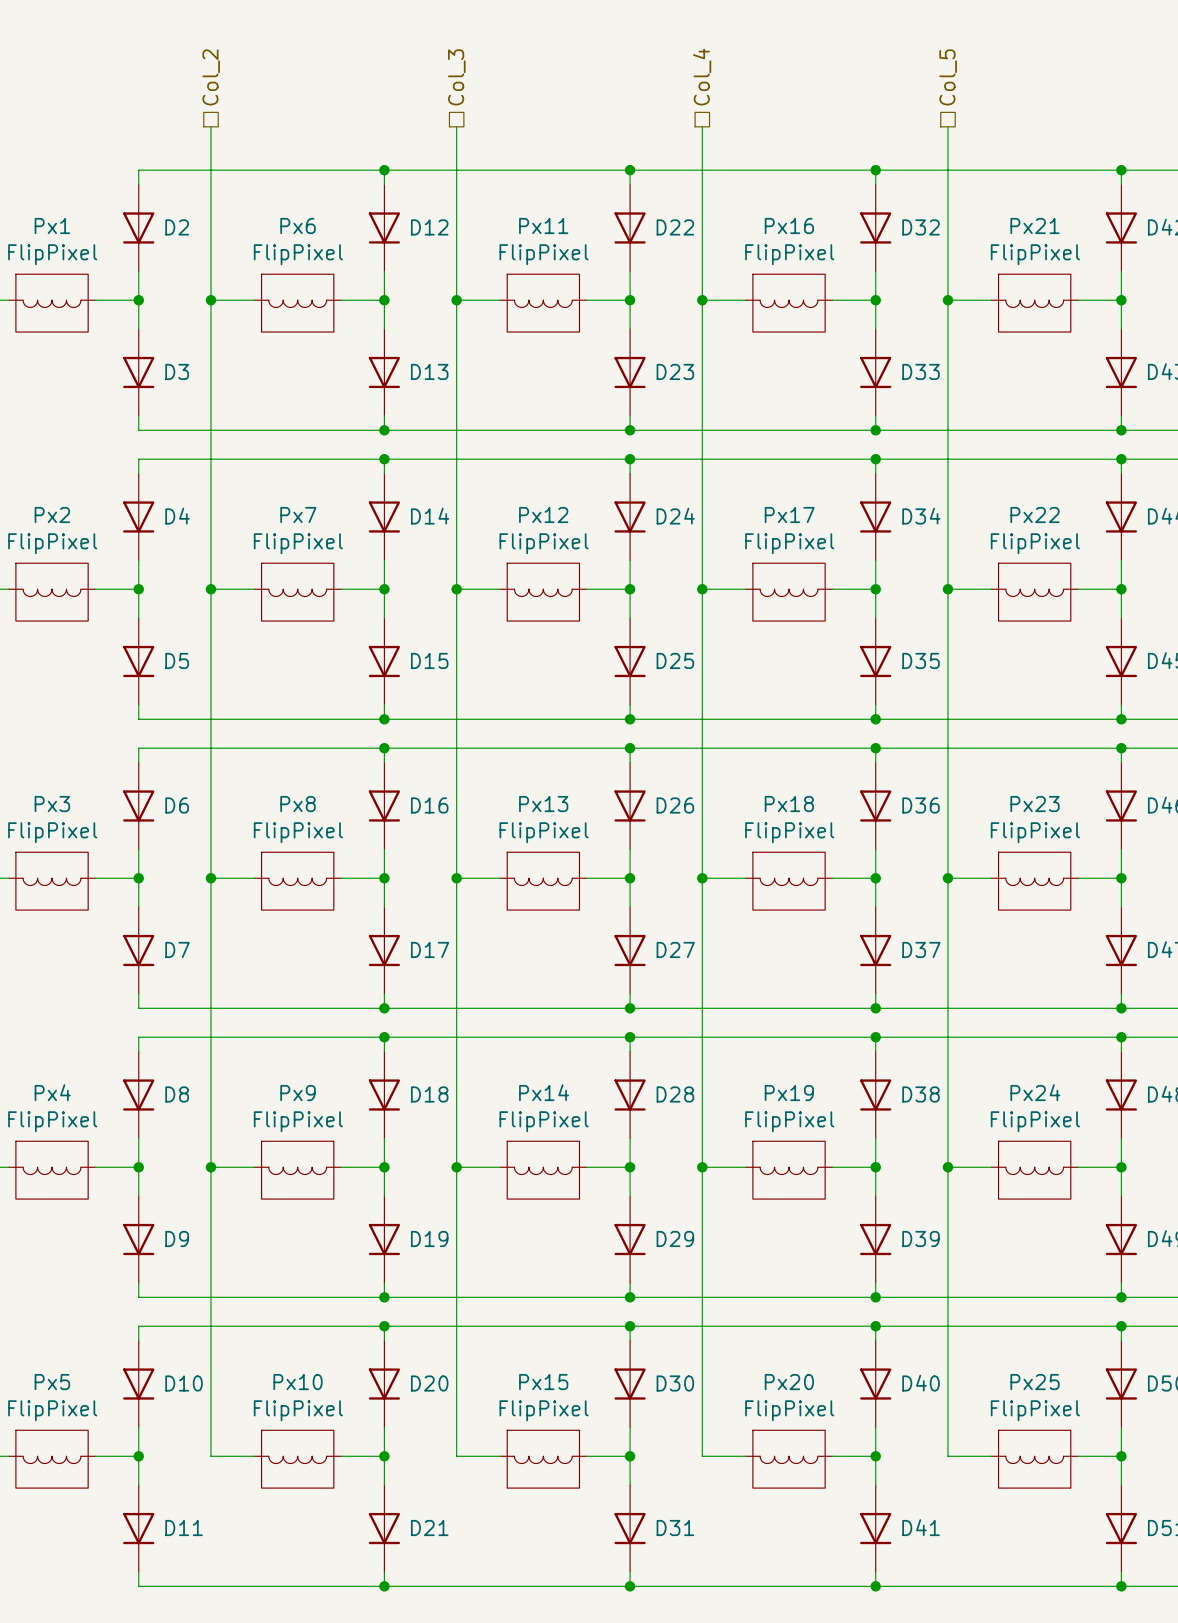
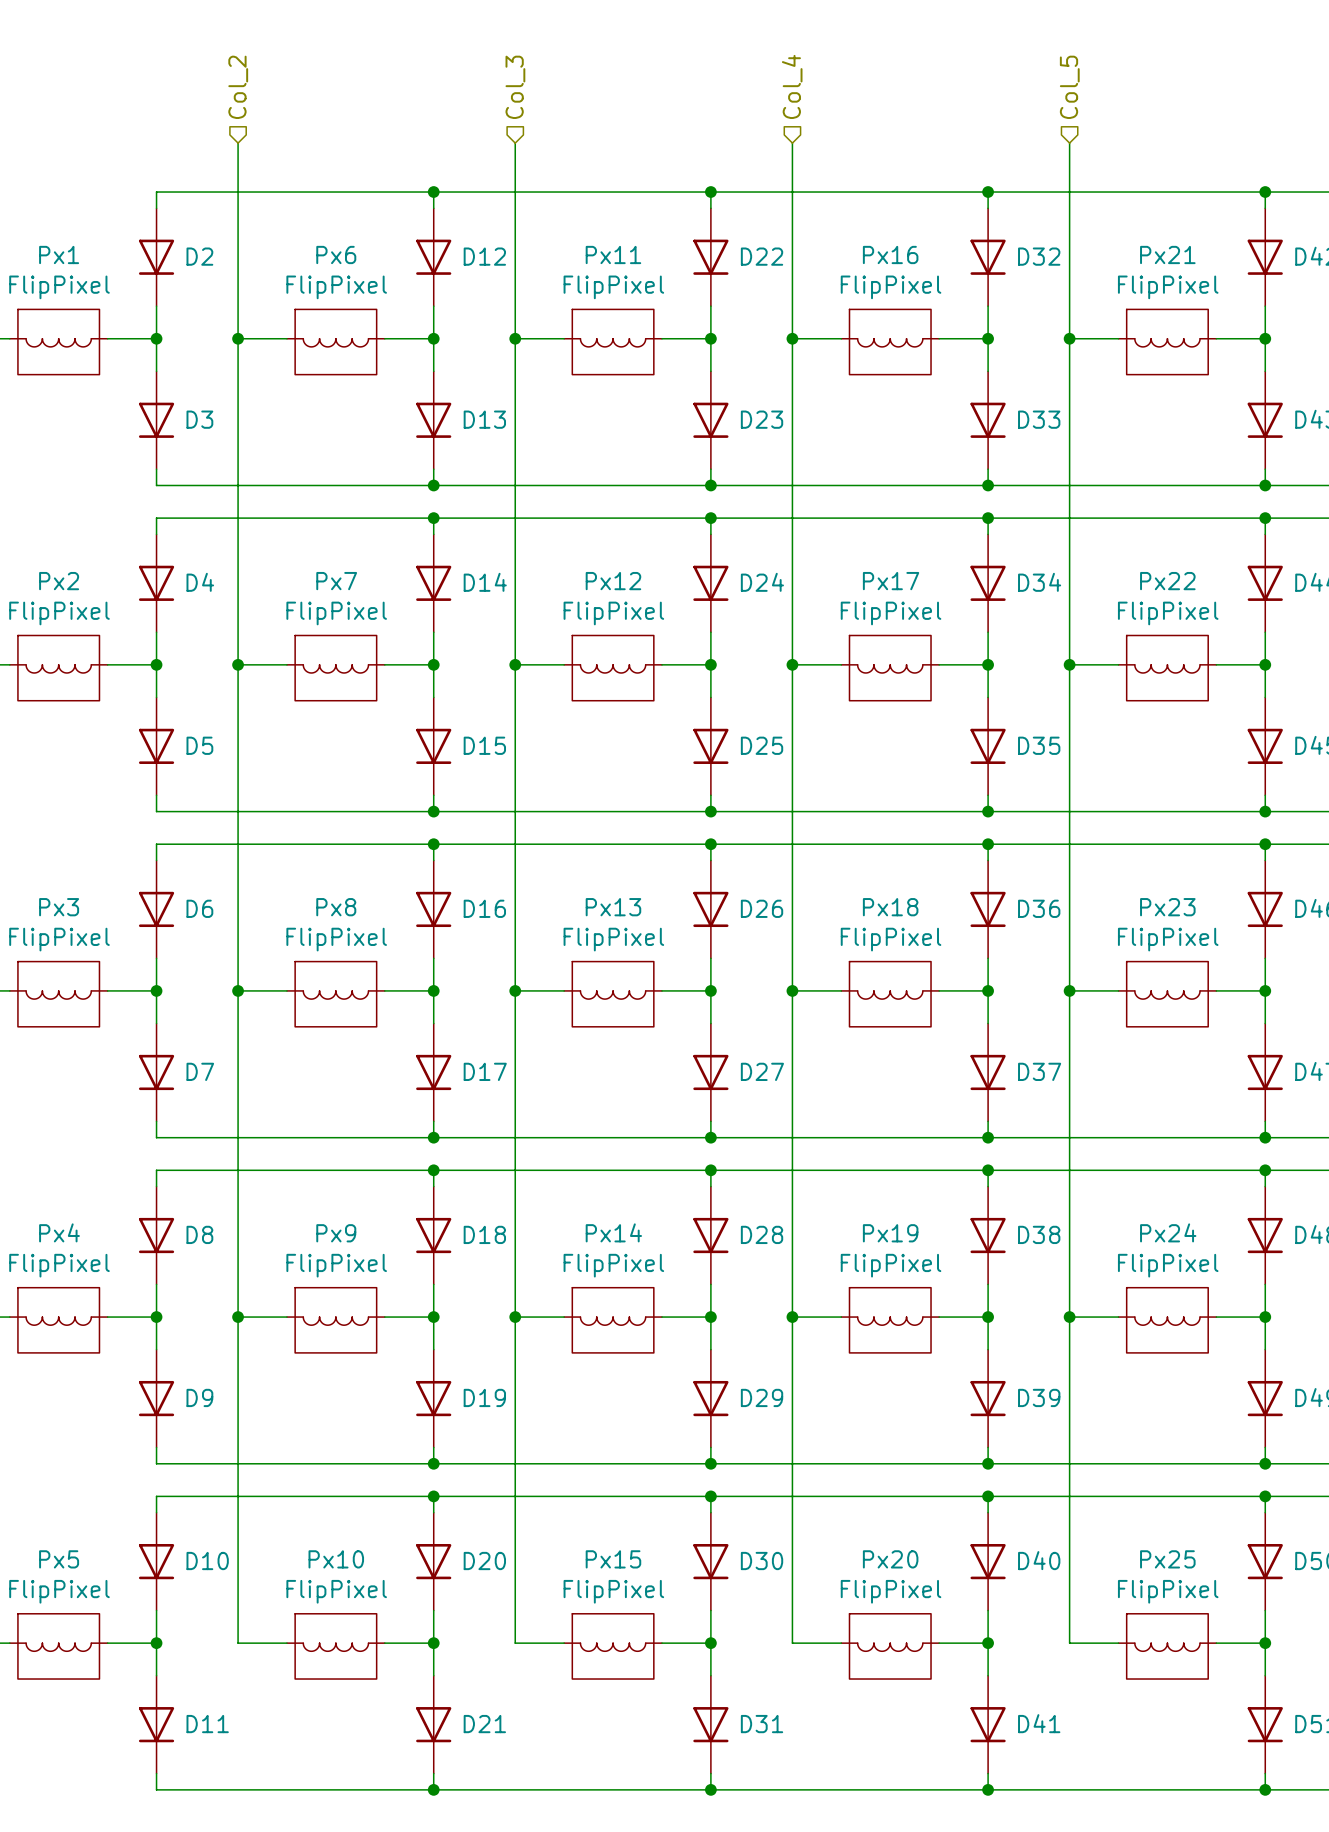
hierarchical label shape: passive (211, 77) -> input (238, 87)
hierarchical label shape: passive (456, 77) -> input (515, 87)
hierarchical label shape: passive (702, 77) -> input (792, 86)
hierarchical label shape: passive (948, 77) -> input (1069, 87)

